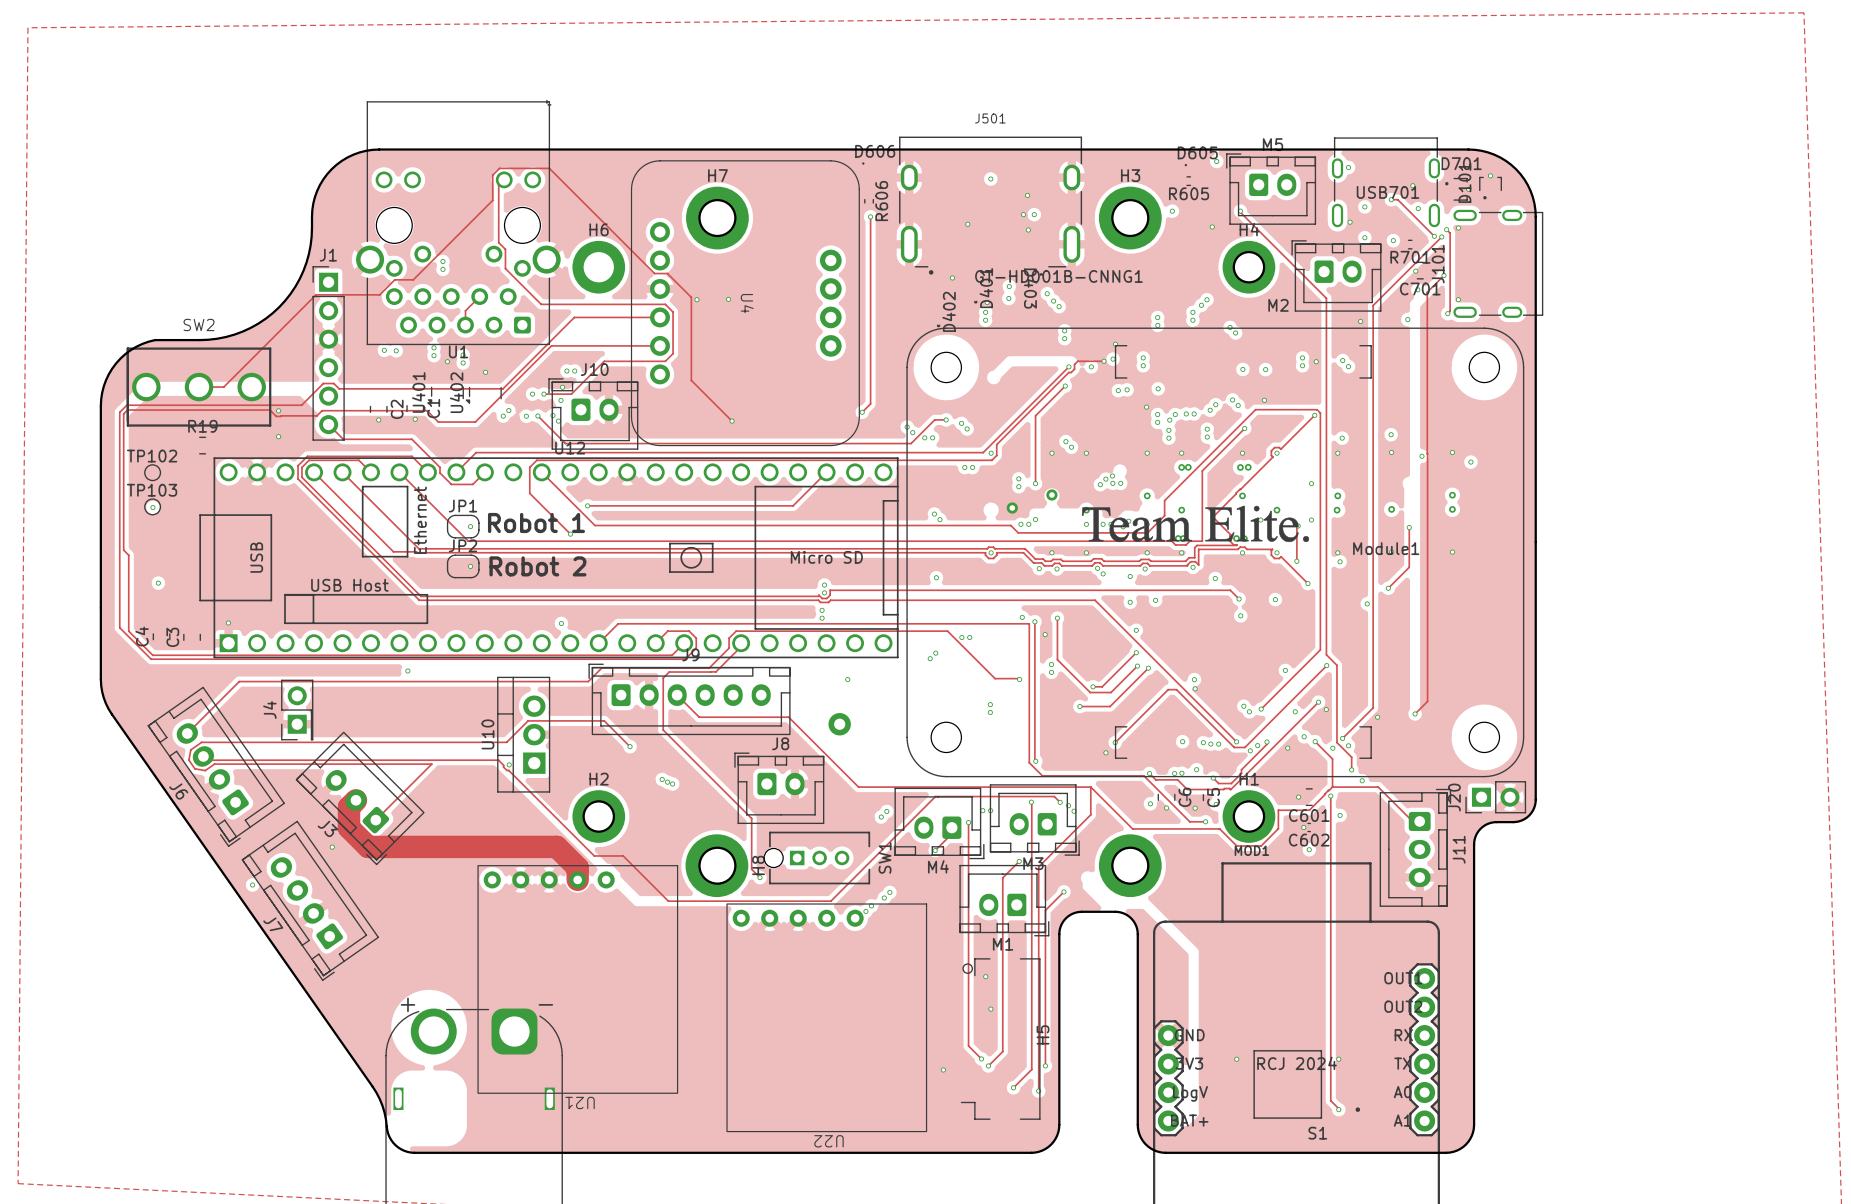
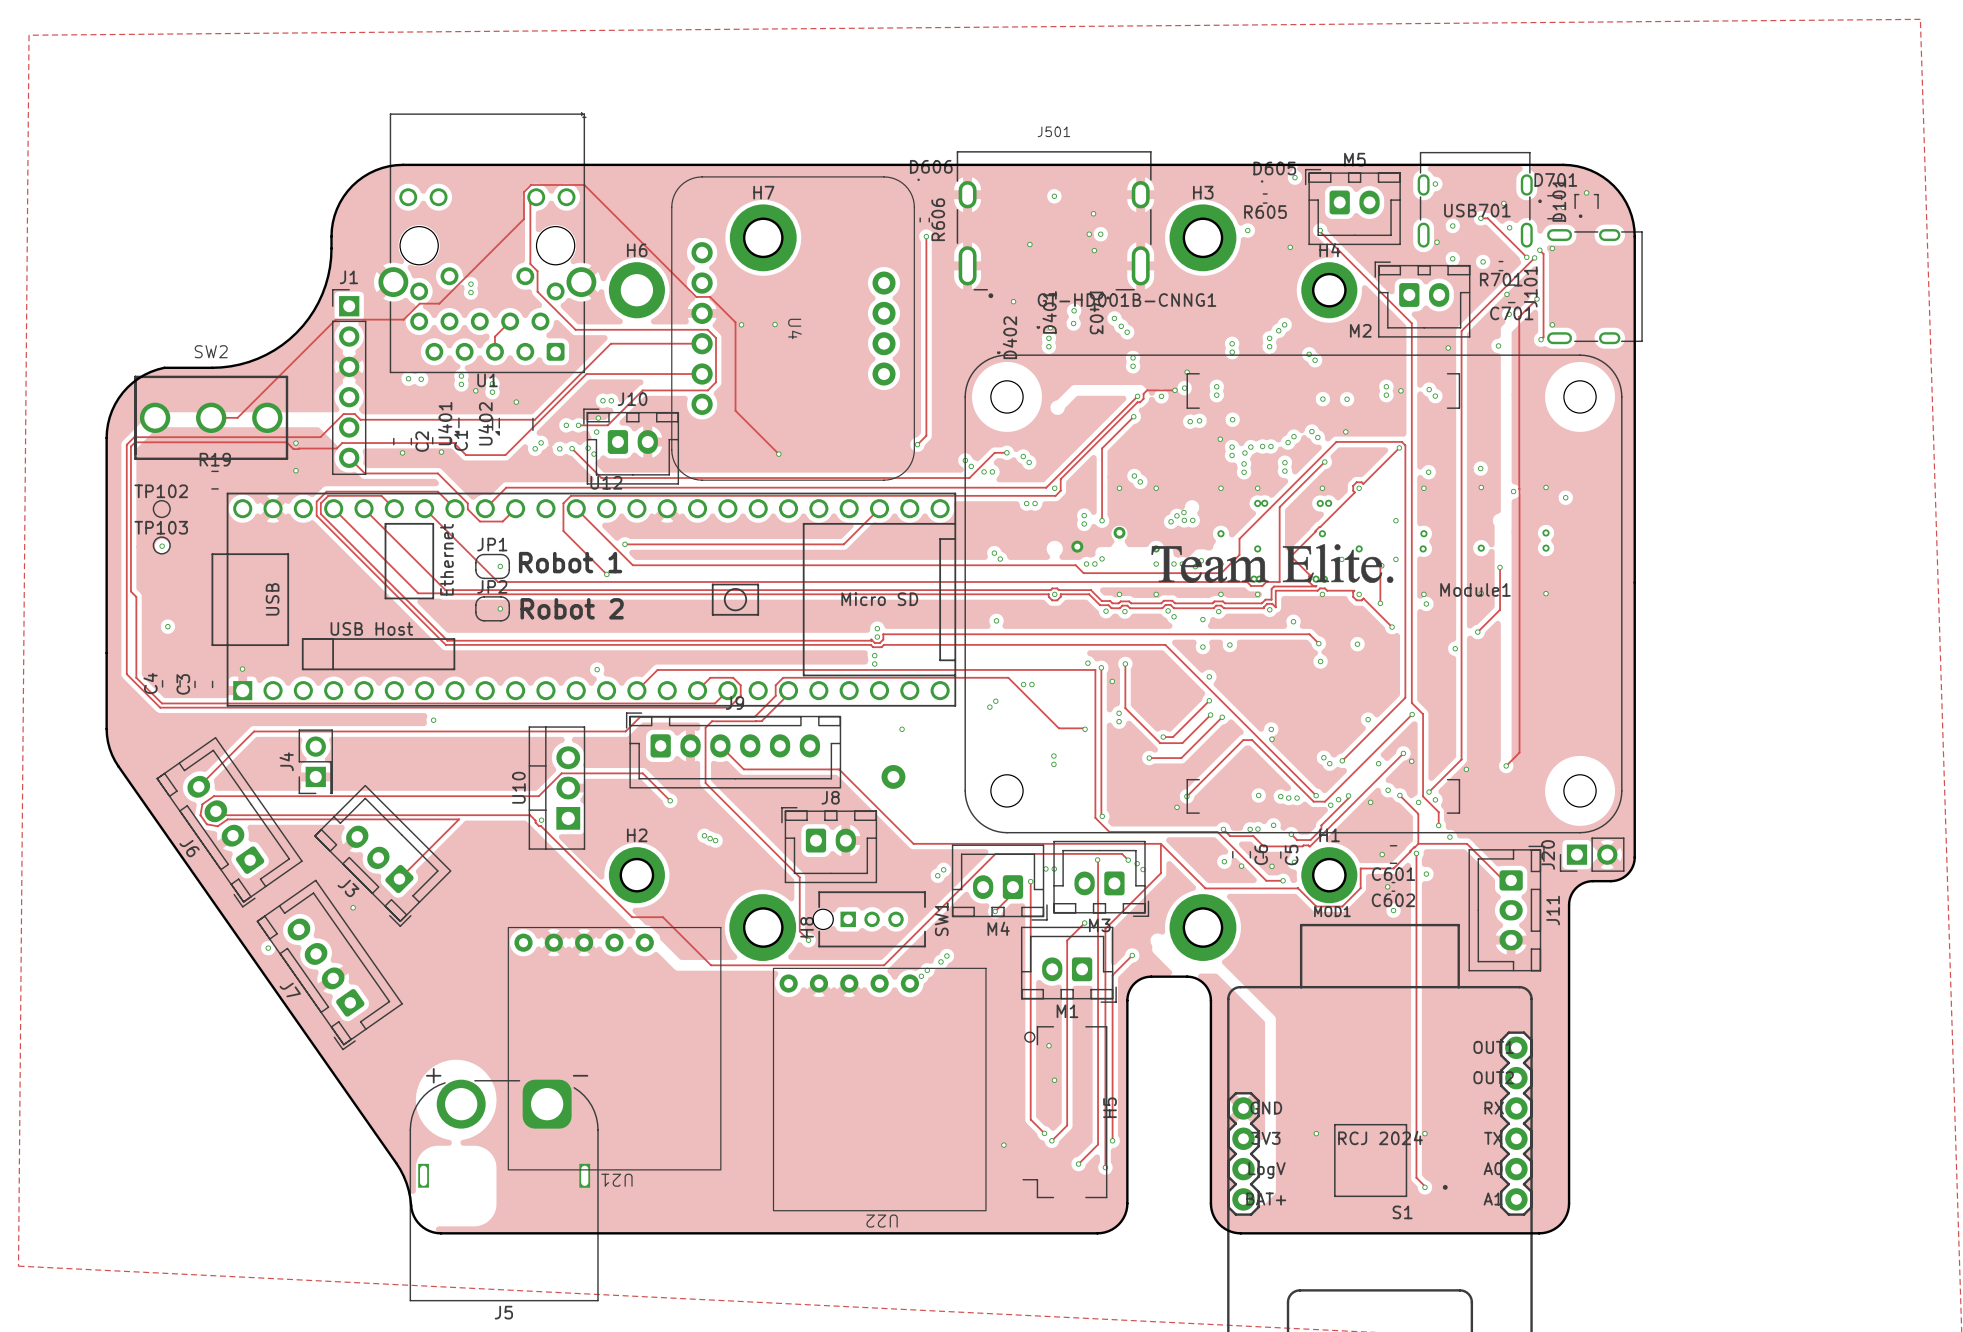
track: (355, 800) (348, 807) (348, 827) (368, 846) (556, 846) (577, 867) (577, 879) -> none

